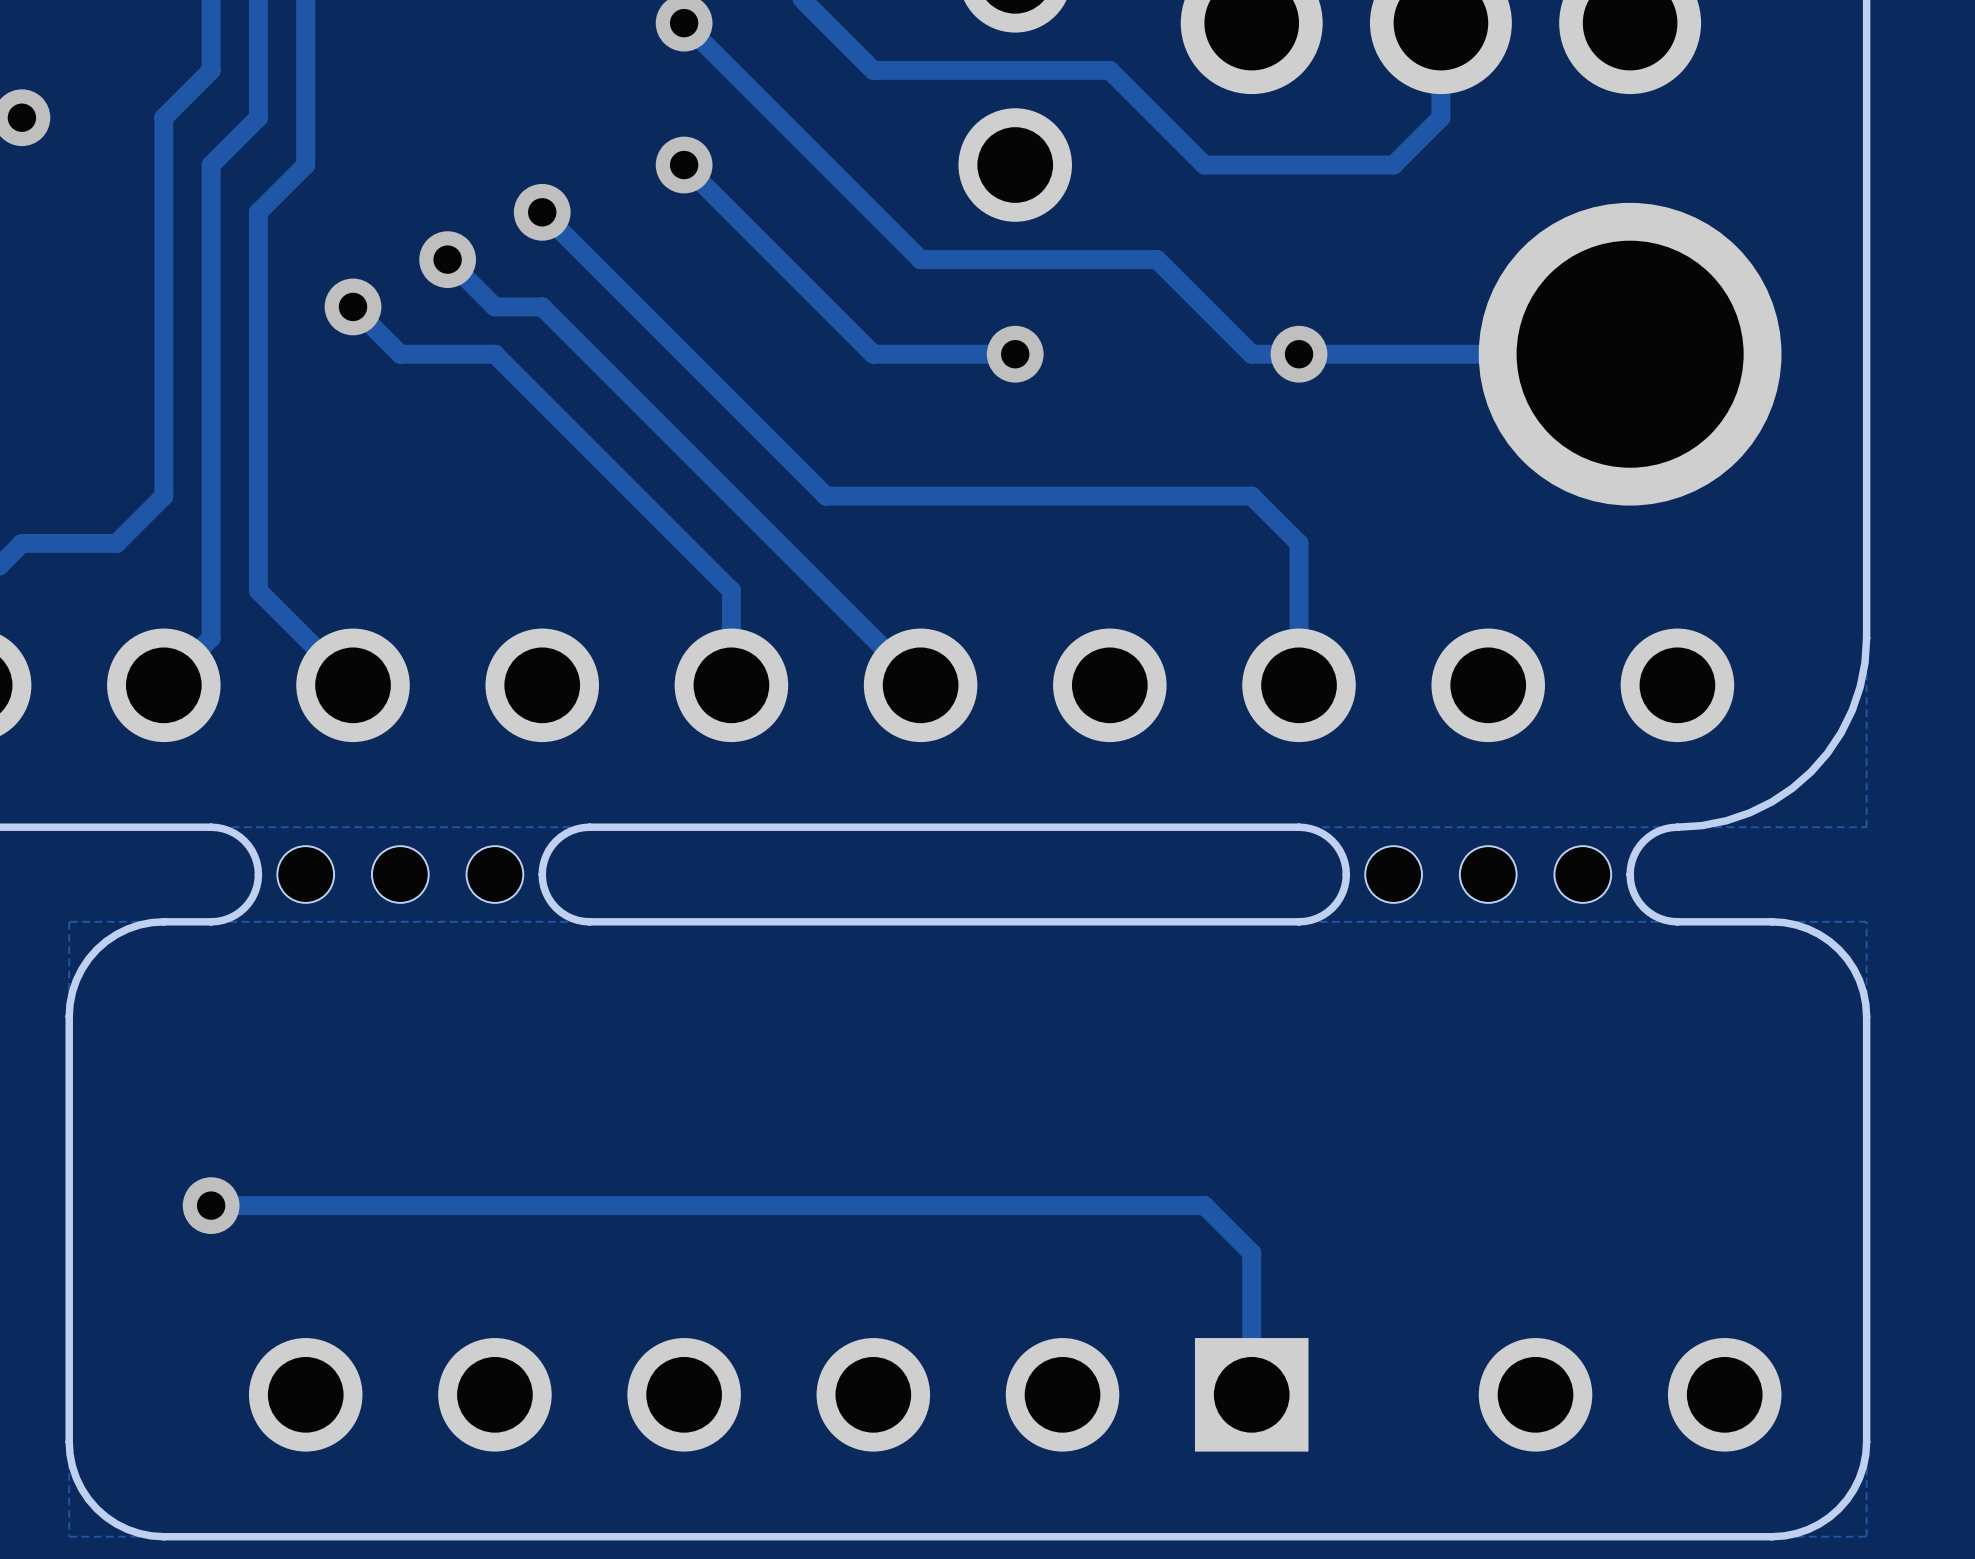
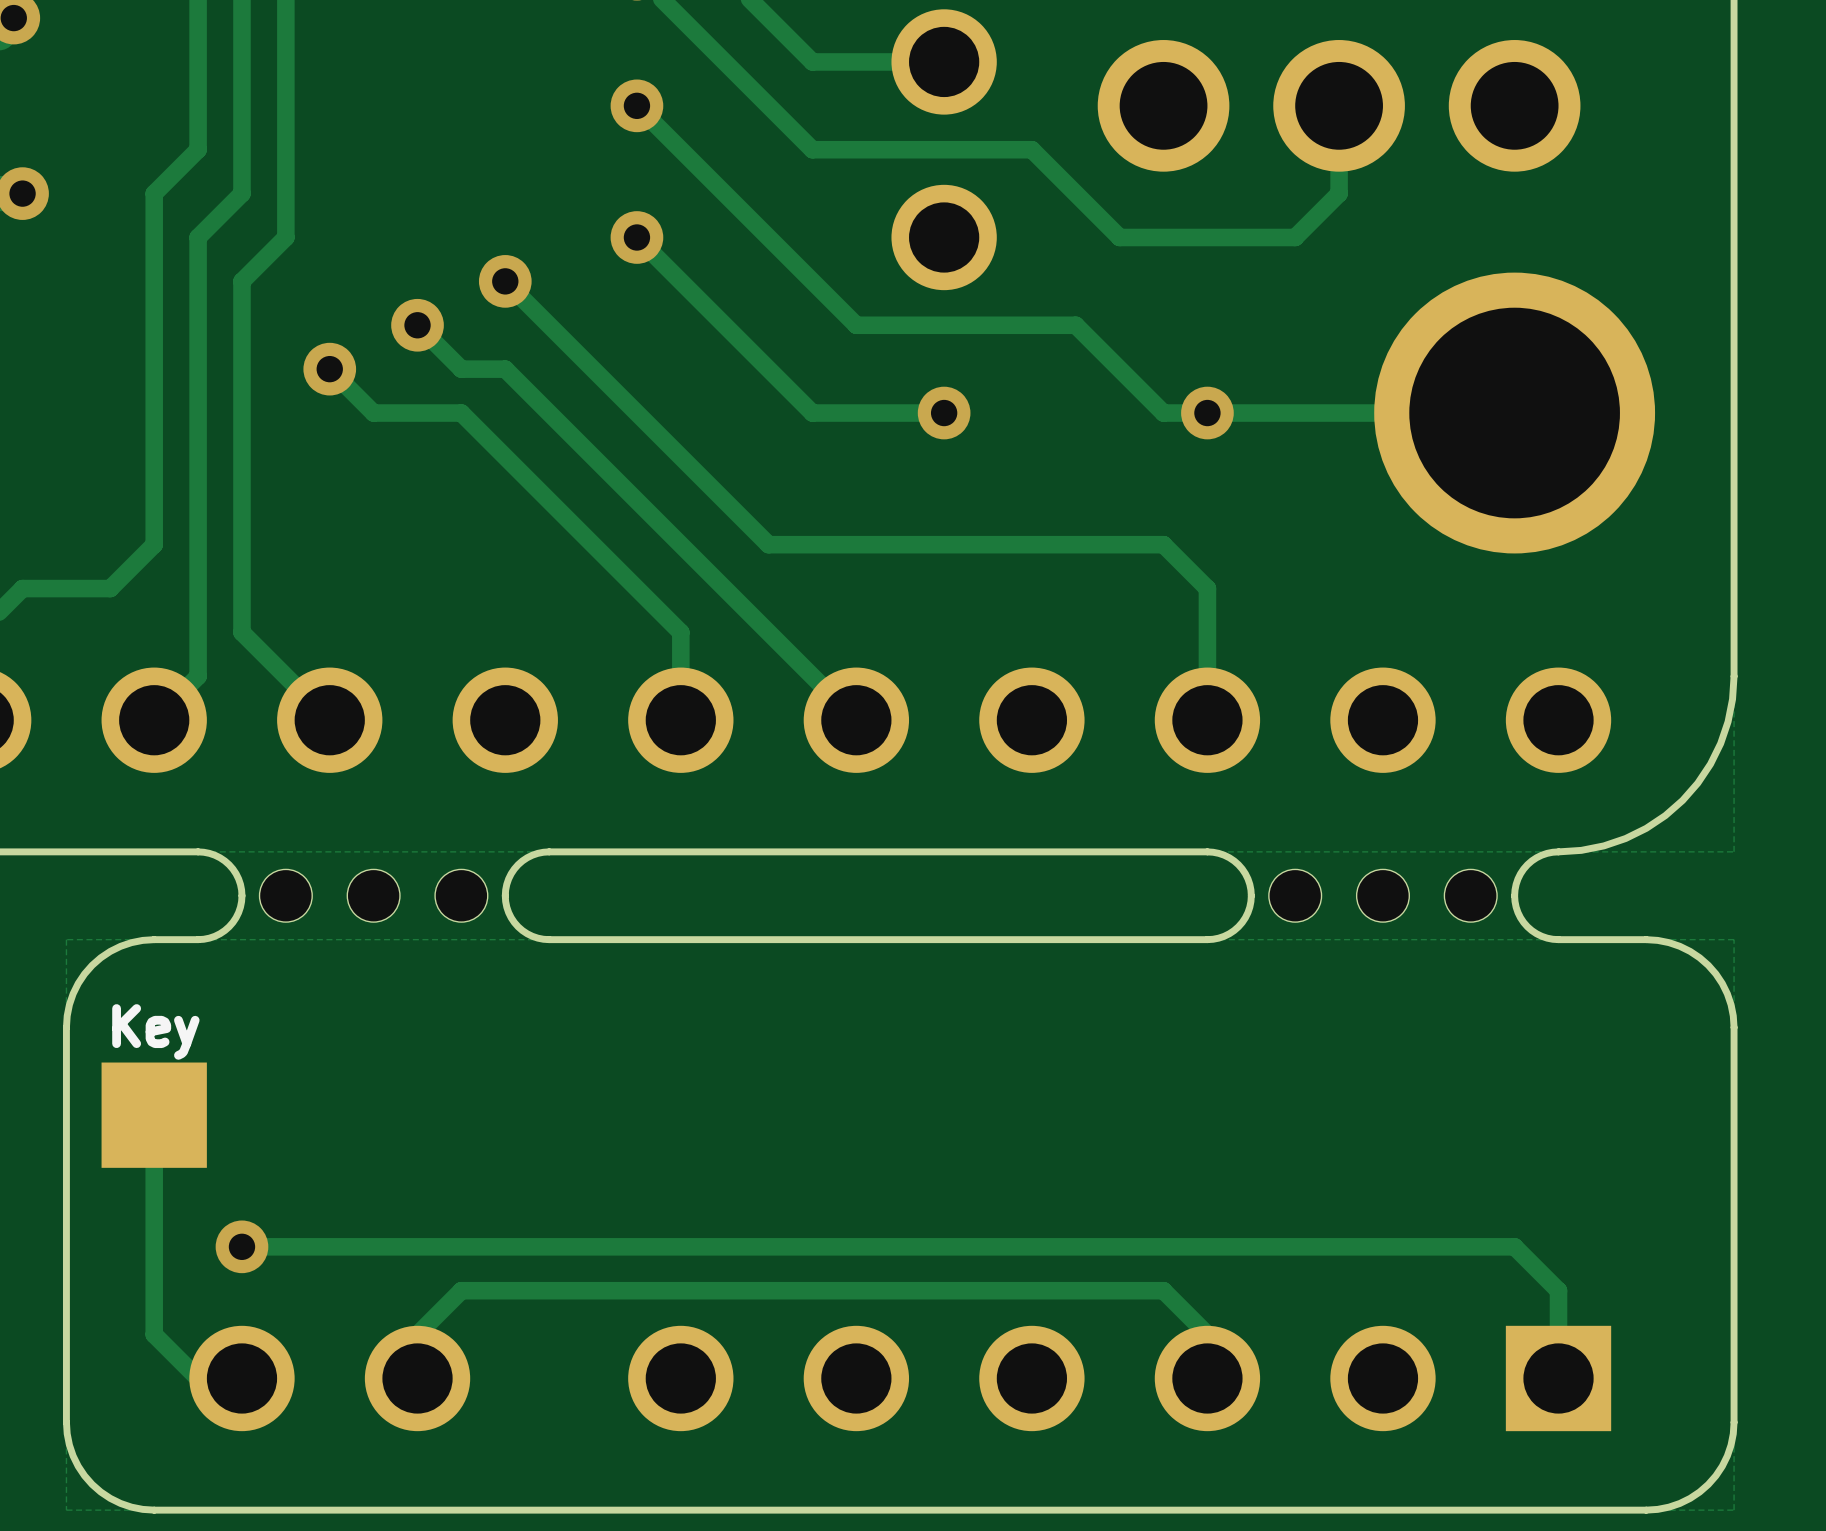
text: none -> Key (155, 1031)
track: none -> (154, 1115) (154, 1334) (198, 1378) (241, 1378)
part: none -> (154, 1115)
track: (211, 1205) (1204, 1205) (1251, 1252) (1251, 1394) -> none
via position: (211, 1205) -> (241, 1246)
track: none -> (241, 1246) (1514, 1246) (1558, 1290) (1558, 1378)
part position: (778, 1394) -> (1119, 1378)
track: none -> (1207, 1378) (1207, 1334) (1163, 1290) (461, 1290) (417, 1334) (417, 1378)
part position: (1630, 1394) -> (329, 1378)

